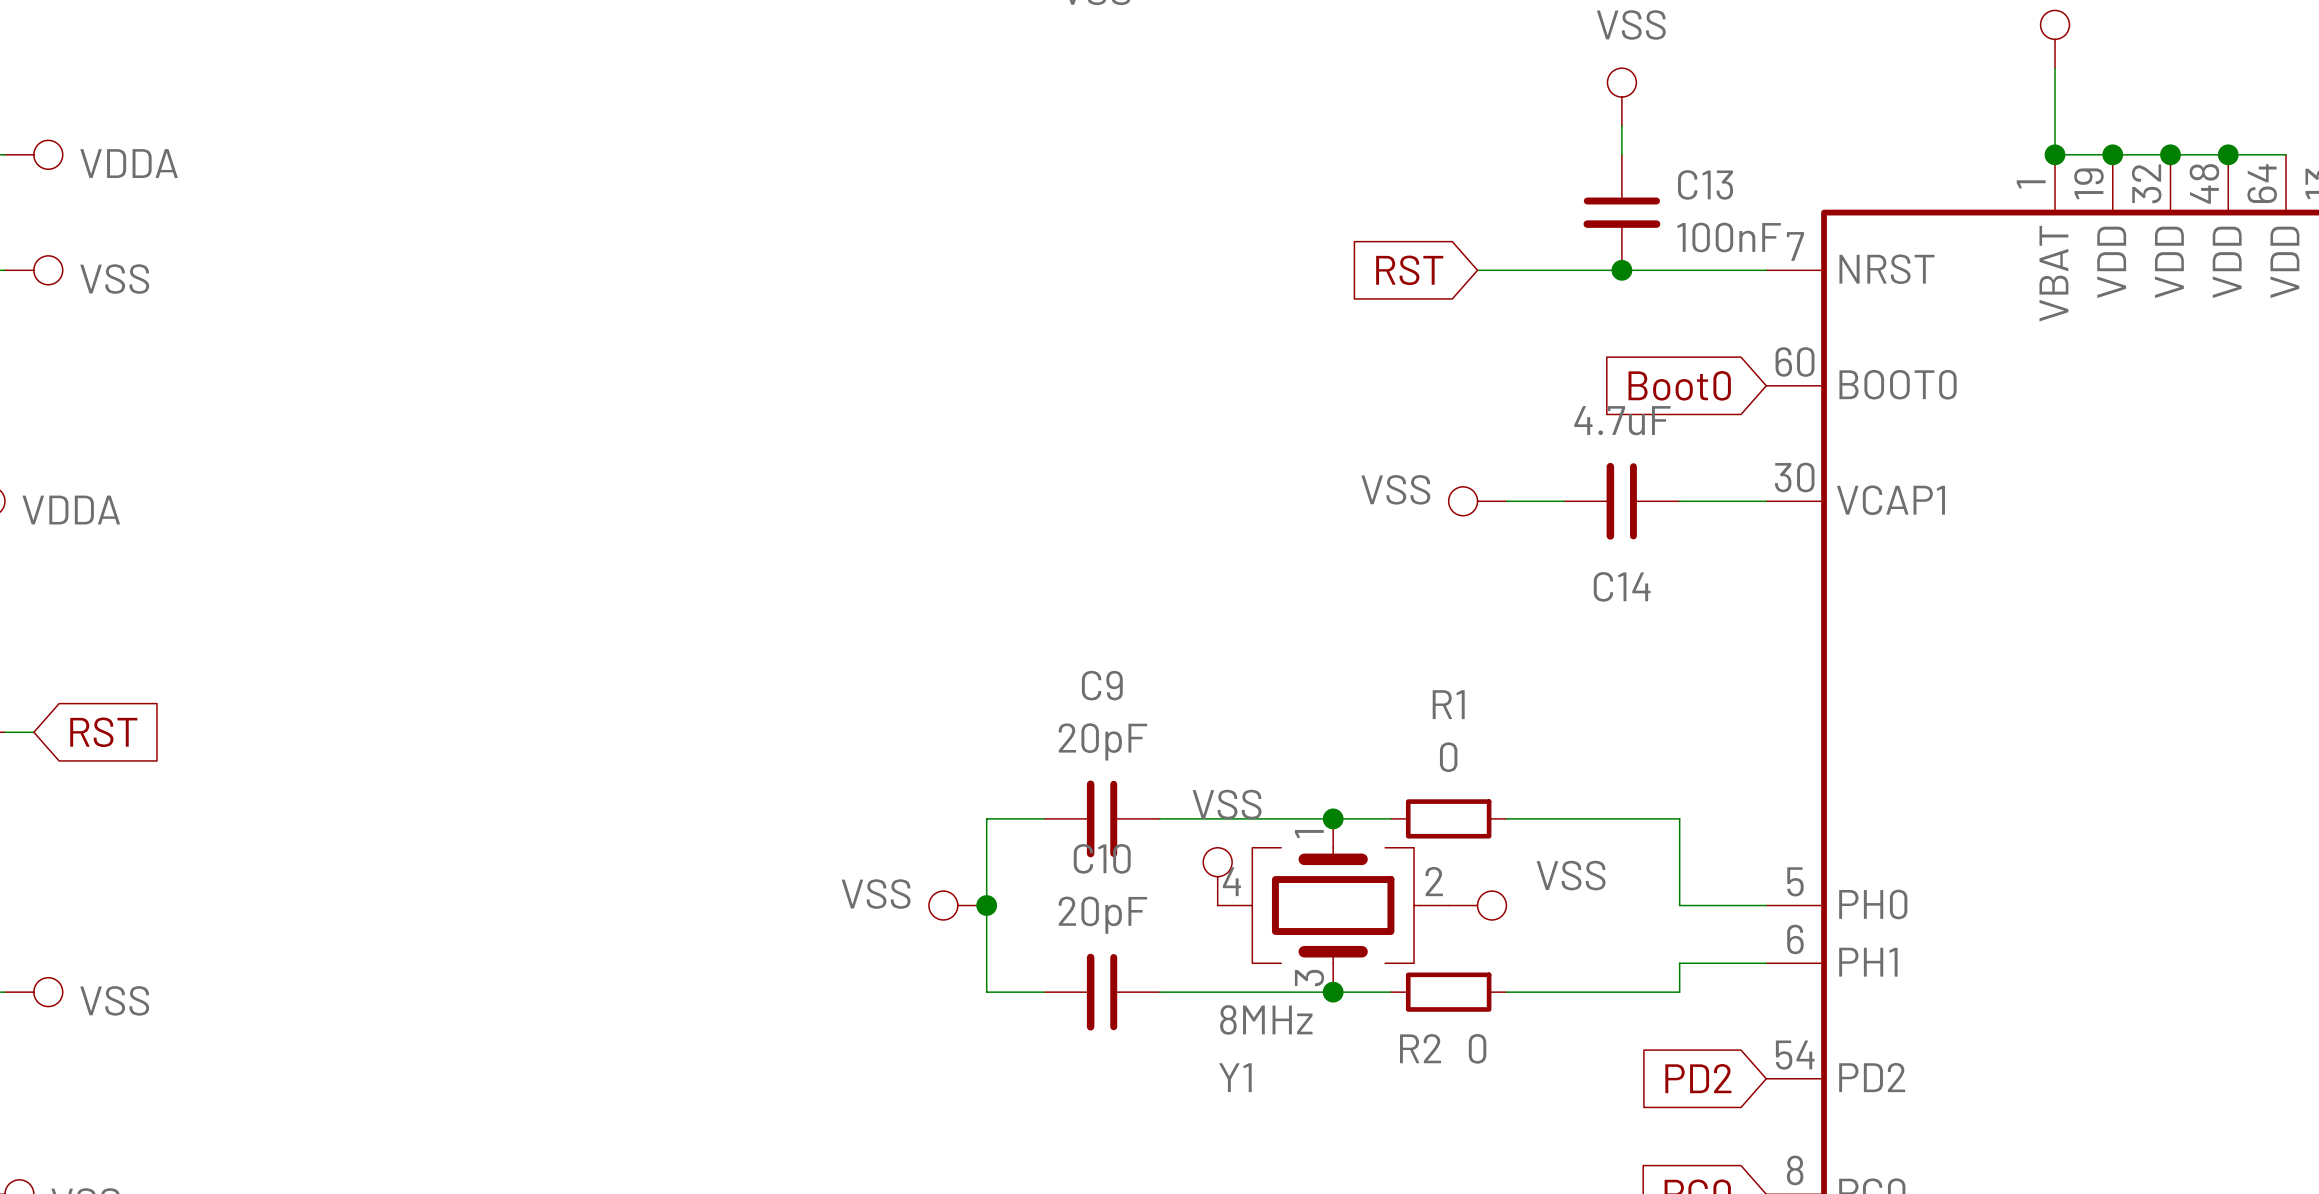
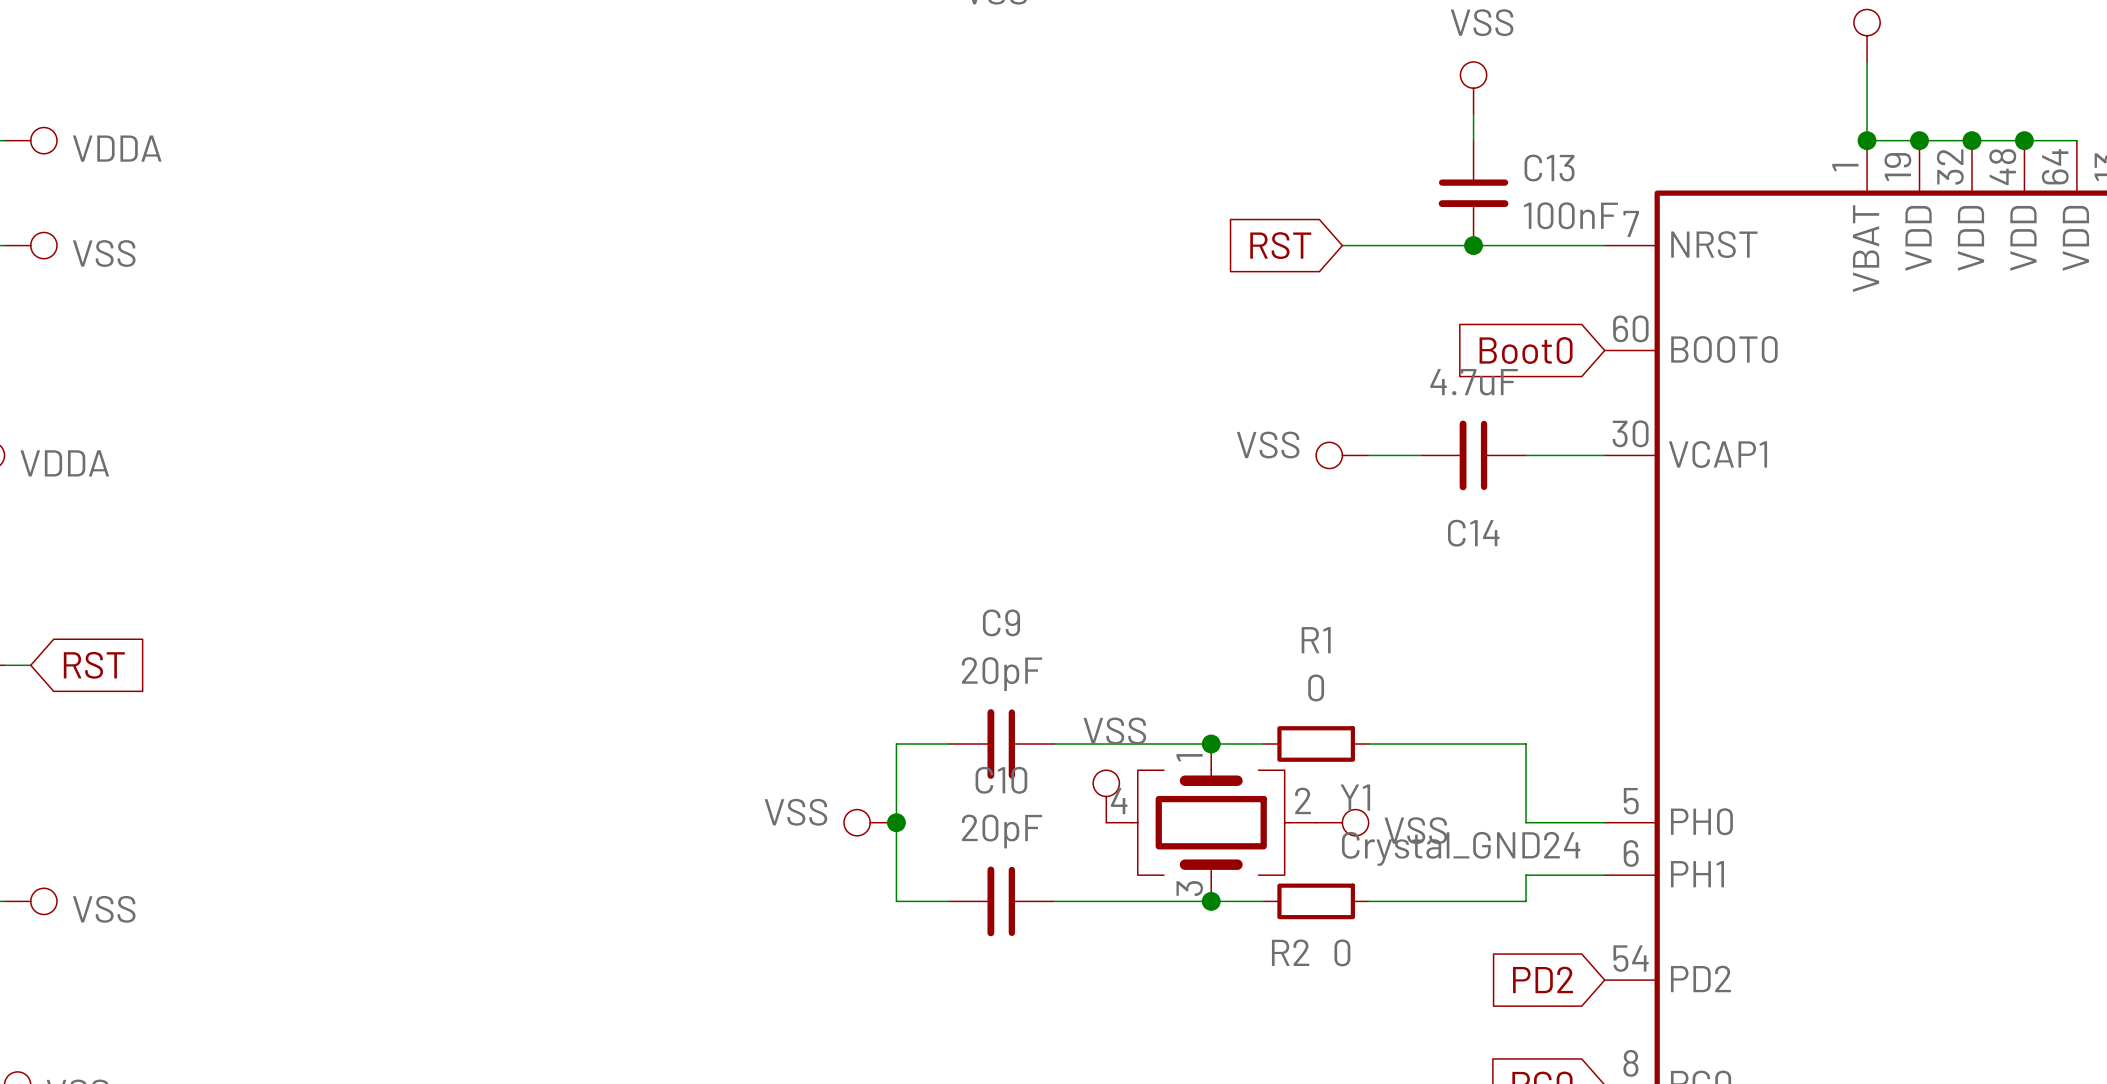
power symbol text position: VSS (1571, 875) -> VSS (1415, 830)
Y1 value: 8MHz (1266, 1019) -> Crystal_GND24 (1461, 848)
Y1 name position: Y1 (1235, 1077) -> Y1 (1355, 797)

